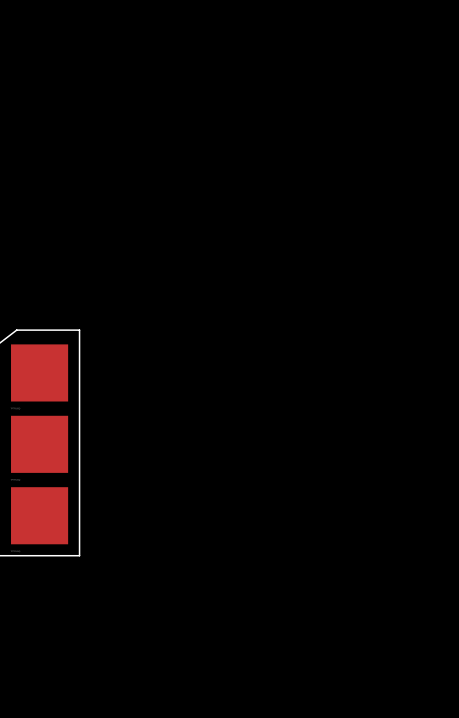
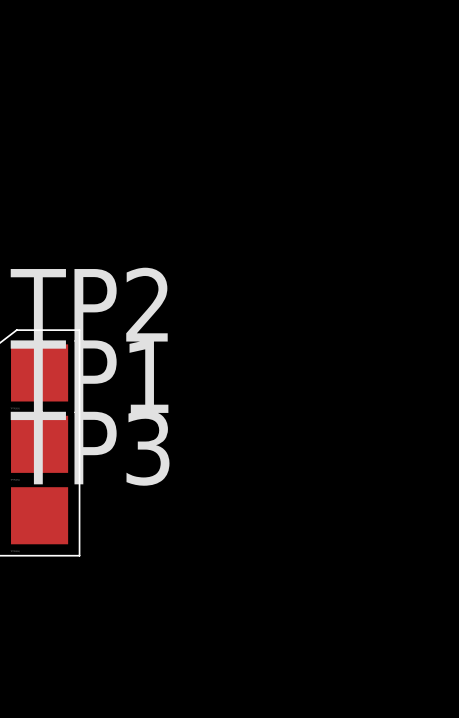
TP2 name: none -> TP2 (89, 304)
TP1 name: none -> TP1 (89, 376)
TP3 name: none -> TP3 (90, 448)

